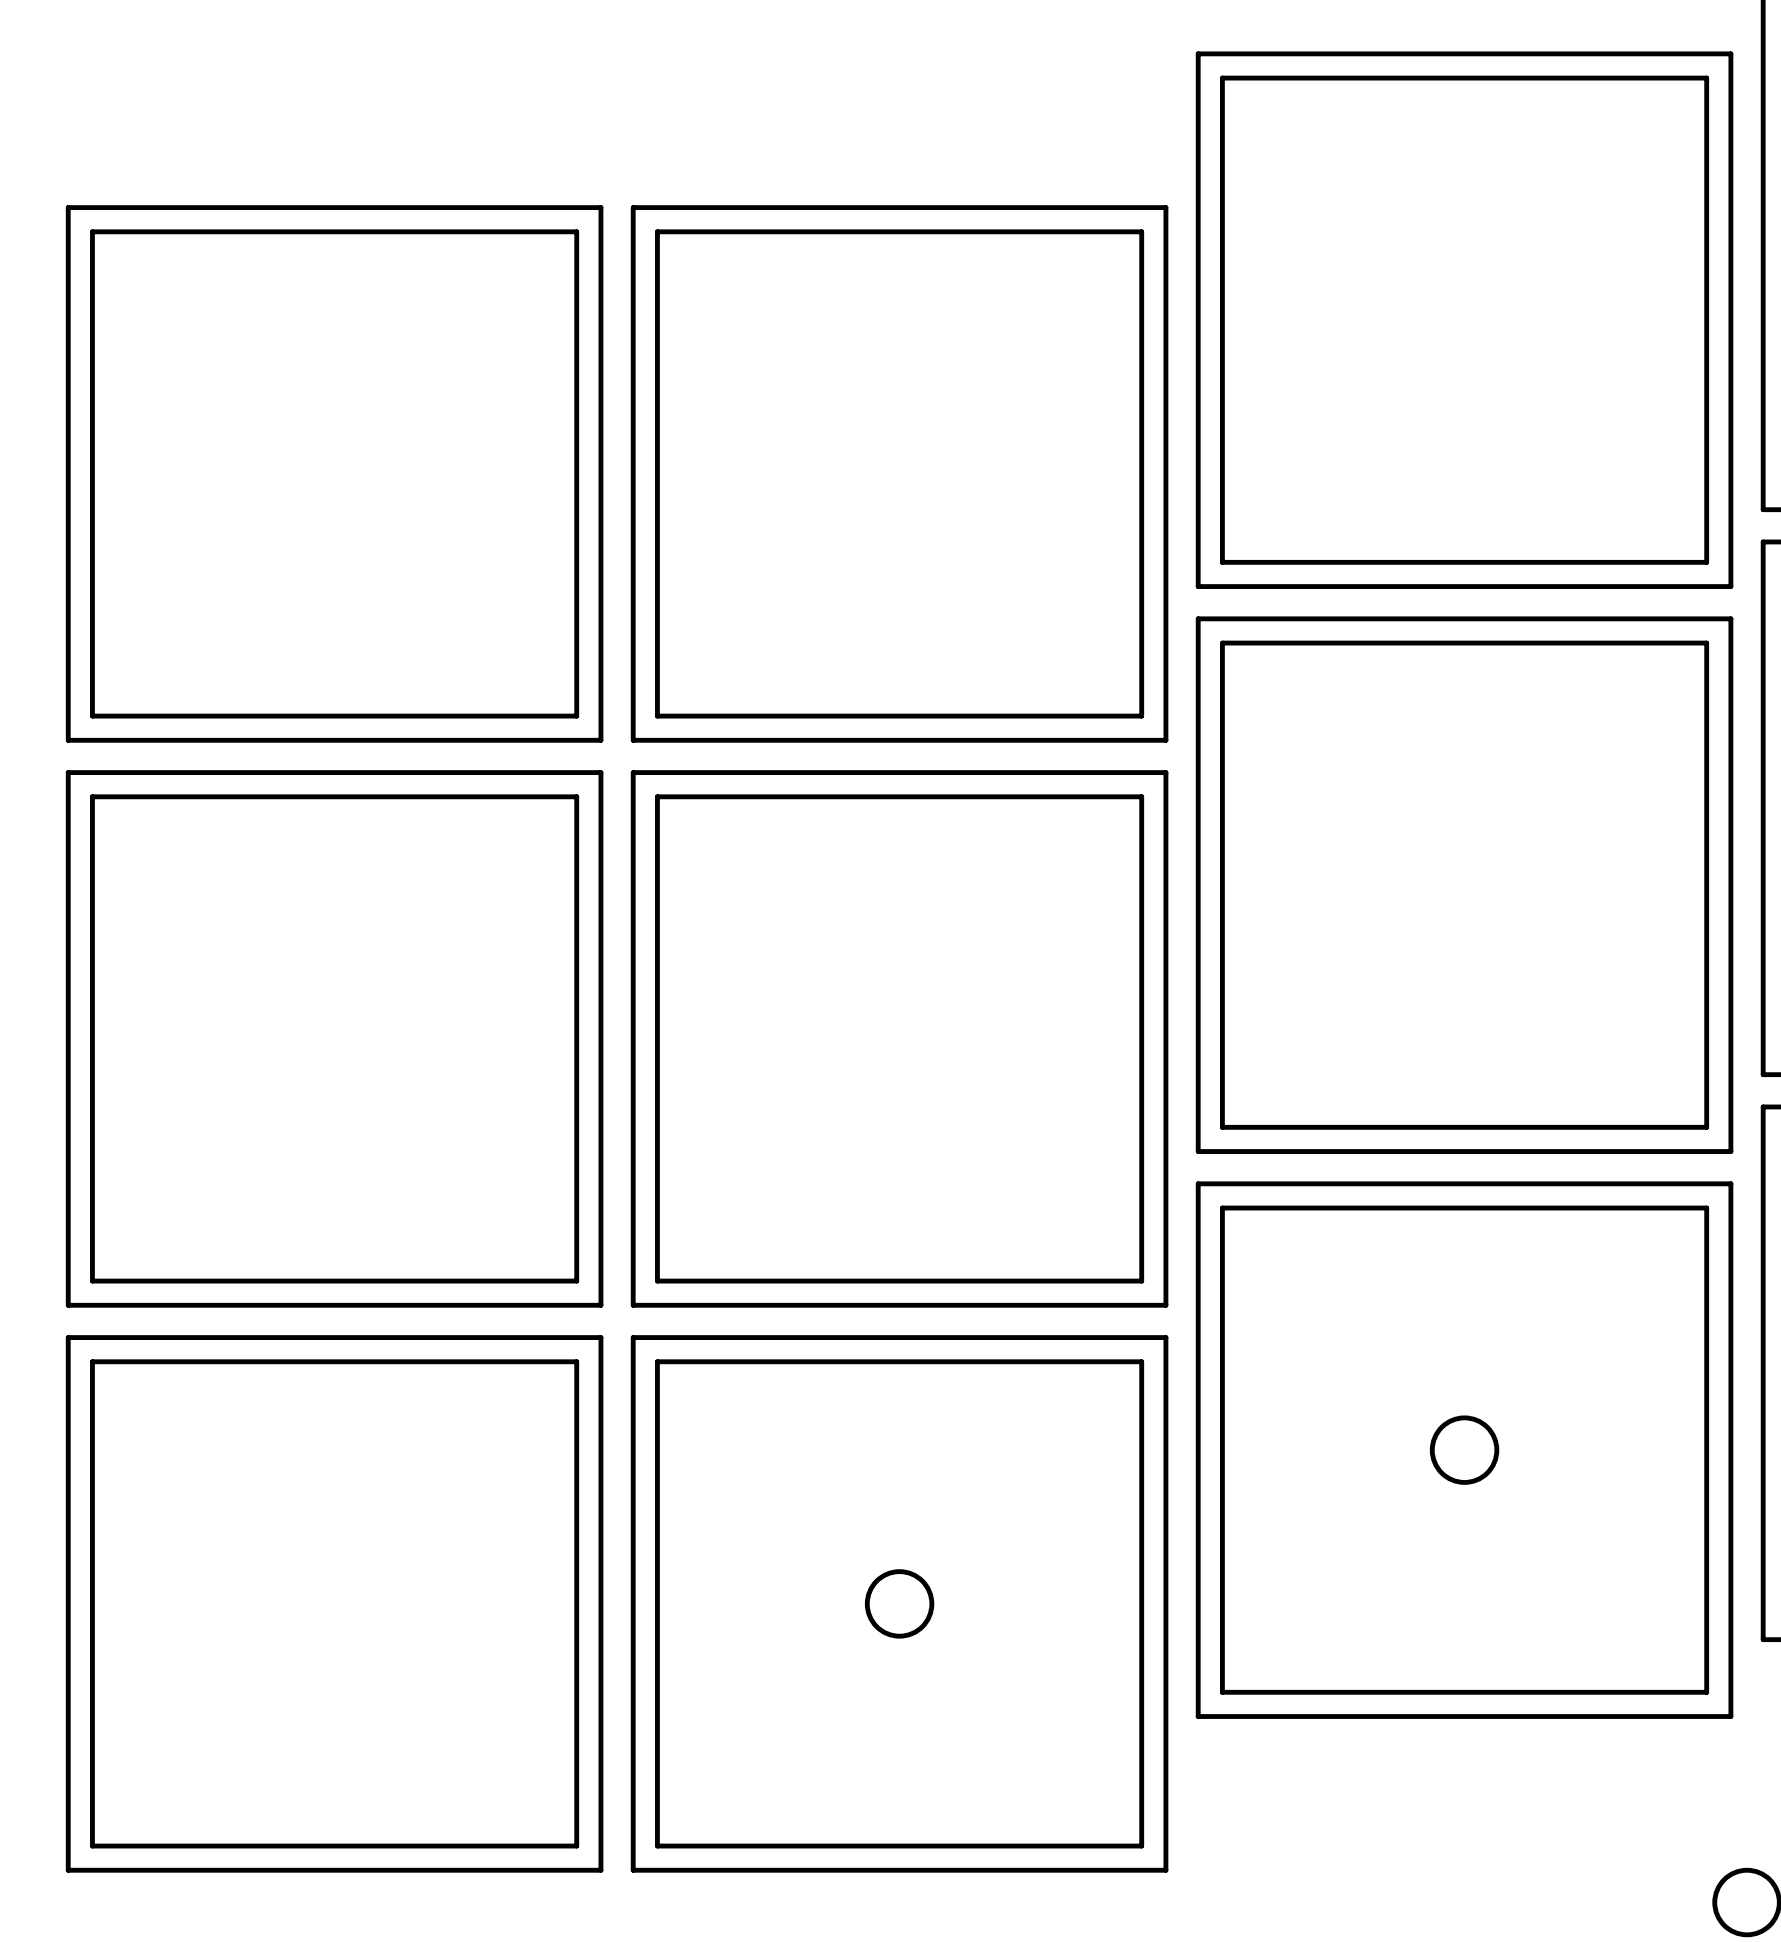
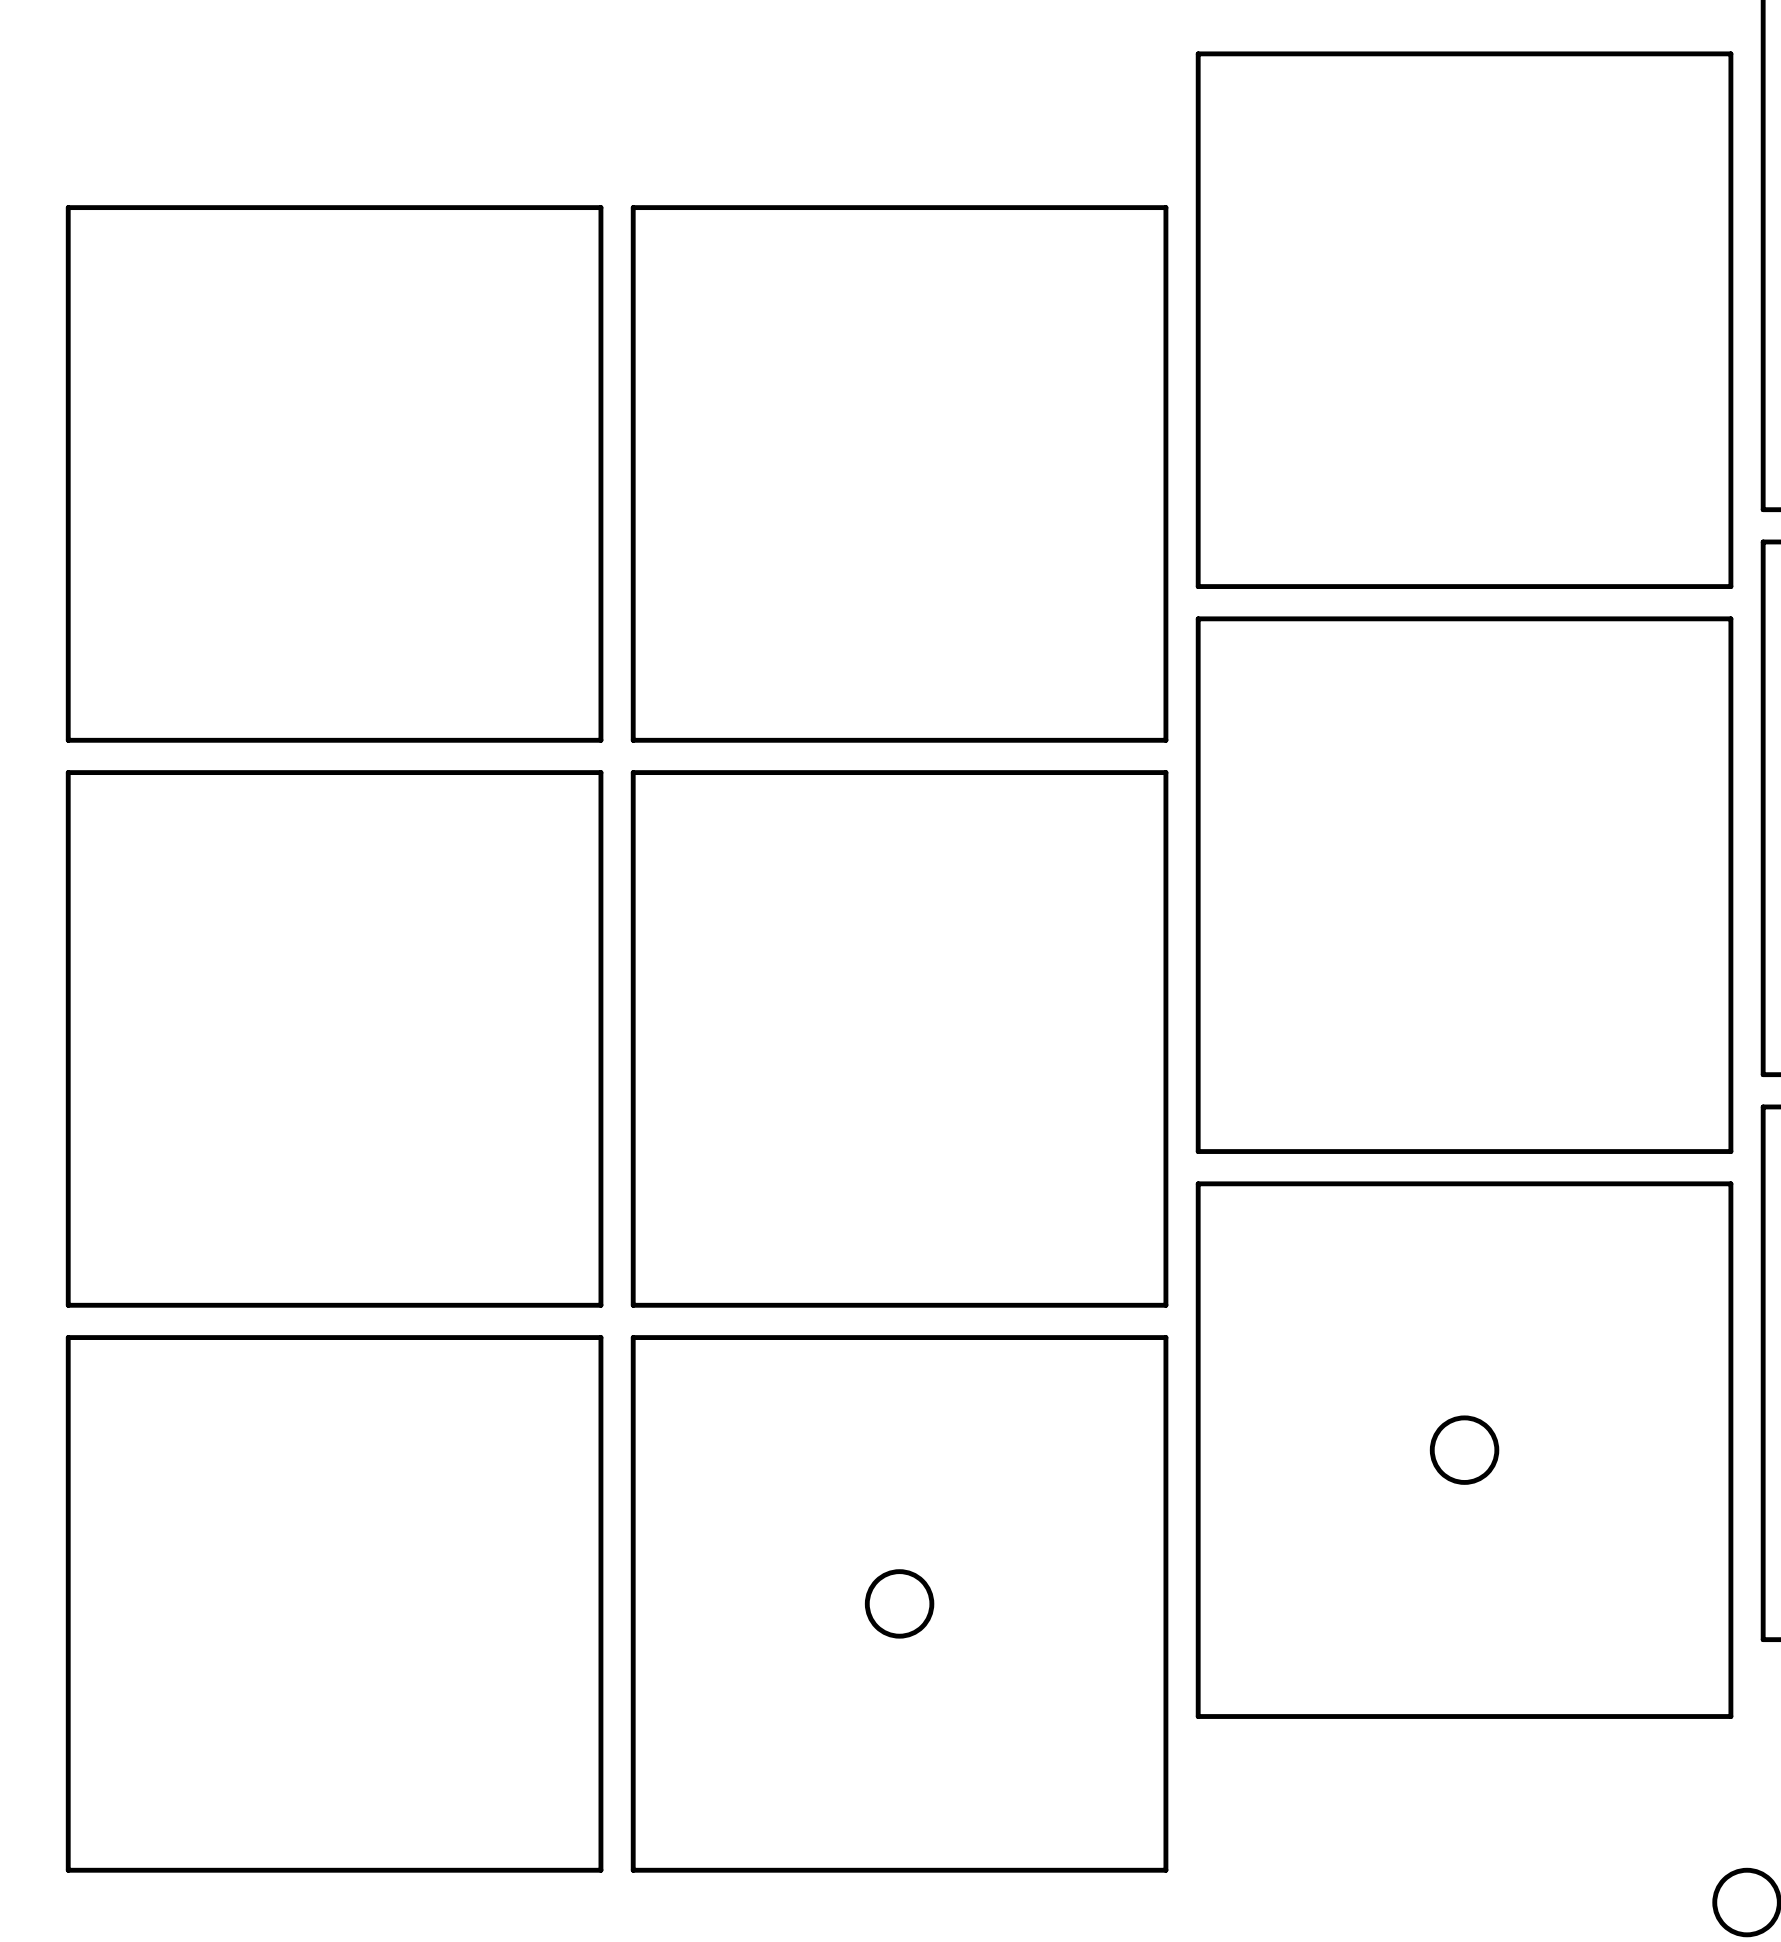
board edge: (1222, 78) (1222, 562) (1706, 562) (1706, 78) (1222, 78) -> none
board edge: (92, 231) (92, 716) (576, 716) (576, 231) (92, 231) -> none
board edge: (657, 231) (1141, 231) (1141, 716) (657, 716) (657, 231) -> none
board edge: (1222, 643) (1222, 1127) (1706, 1127) (1706, 643) (1222, 643) -> none
board edge: (92, 796) (92, 1281) (576, 1281) (576, 796) (92, 796) -> none
board edge: (657, 796) (1141, 796) (1141, 1281) (657, 1281) (657, 796) -> none
board edge: (1222, 1208) (1706, 1208) (1706, 1692) (1222, 1692) (1222, 1208) -> none
board edge: (92, 1361) (576, 1361) (576, 1846) (92, 1846) (92, 1361) -> none
board edge: (657, 1361) (1141, 1361) (1141, 1846) (657, 1846) (657, 1361) -> none

